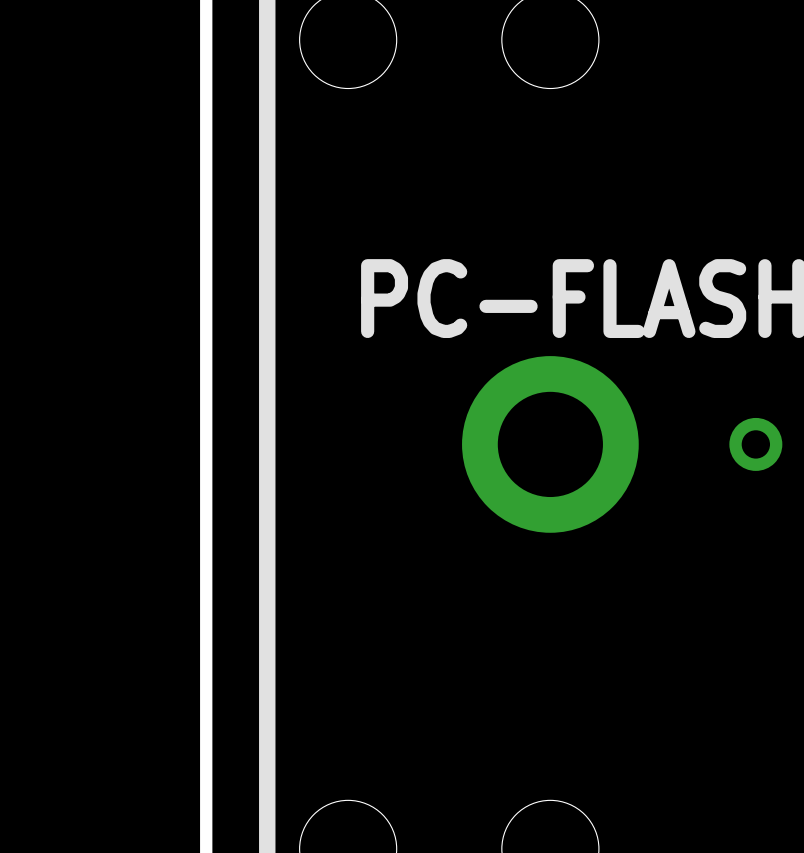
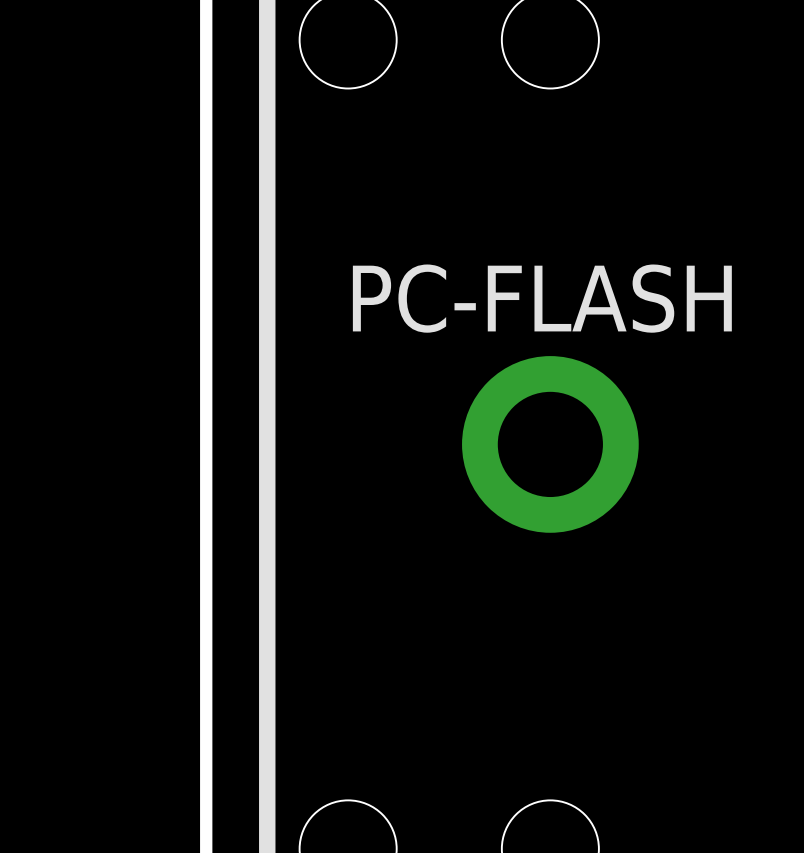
via: (755, 444) -> none

